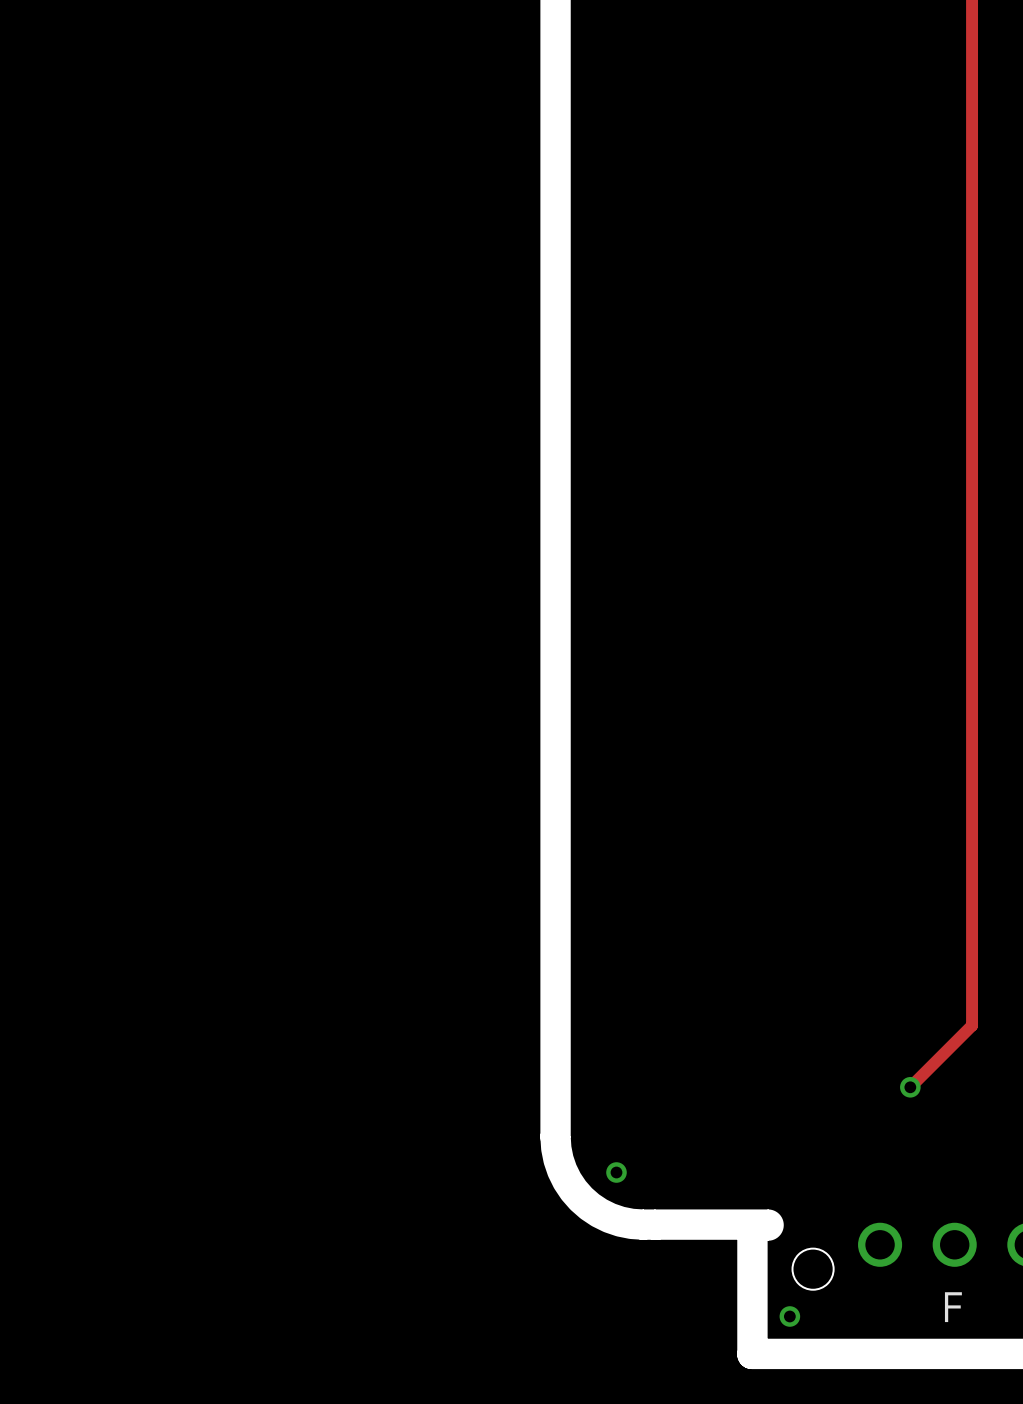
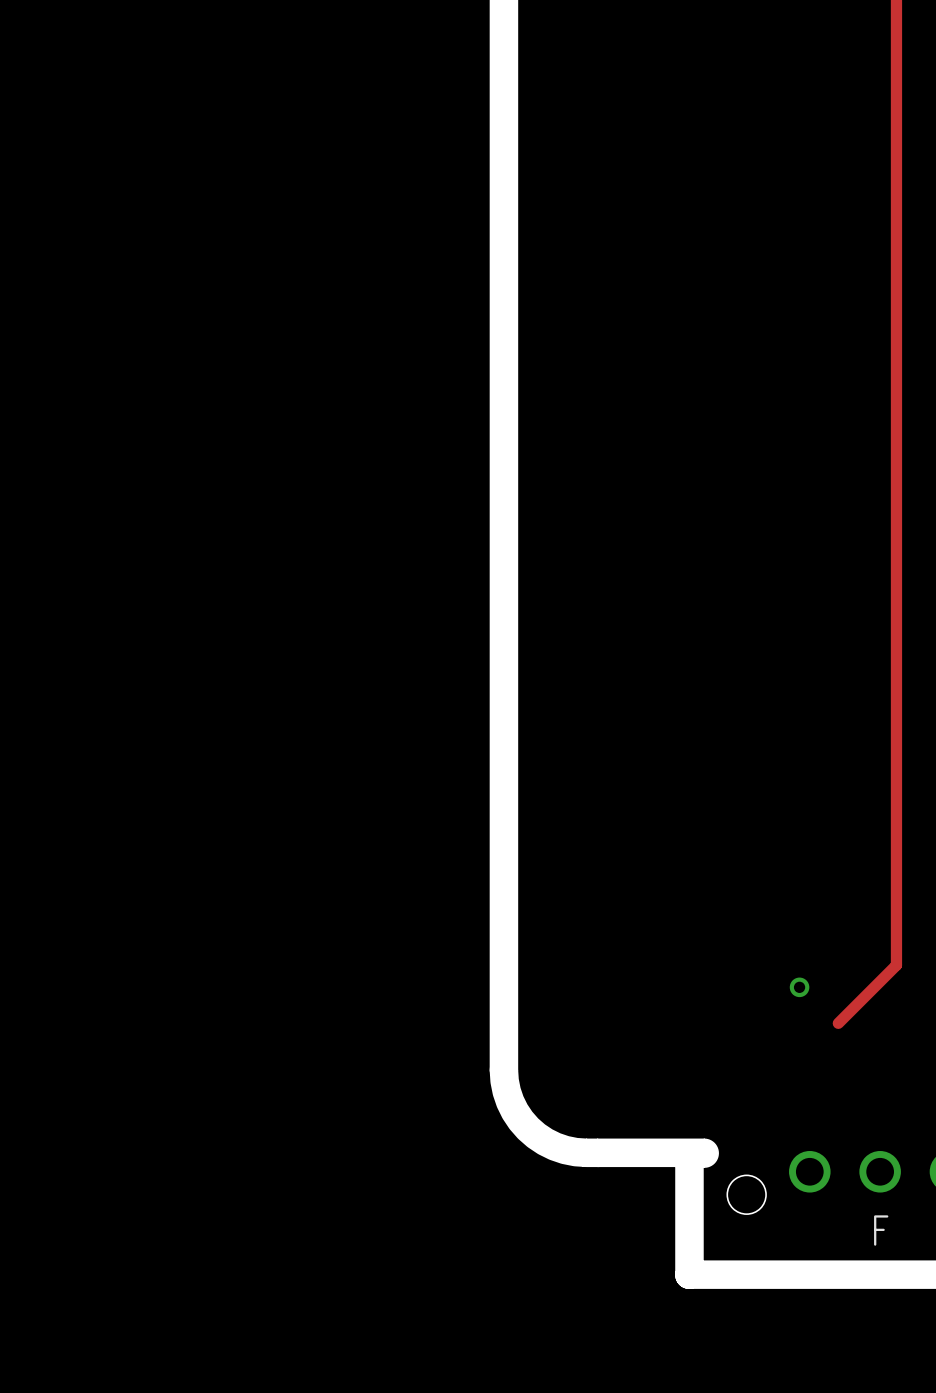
via position: (910, 1087) -> (799, 987)
via: (616, 1172) -> none
via: (789, 1316) -> none

